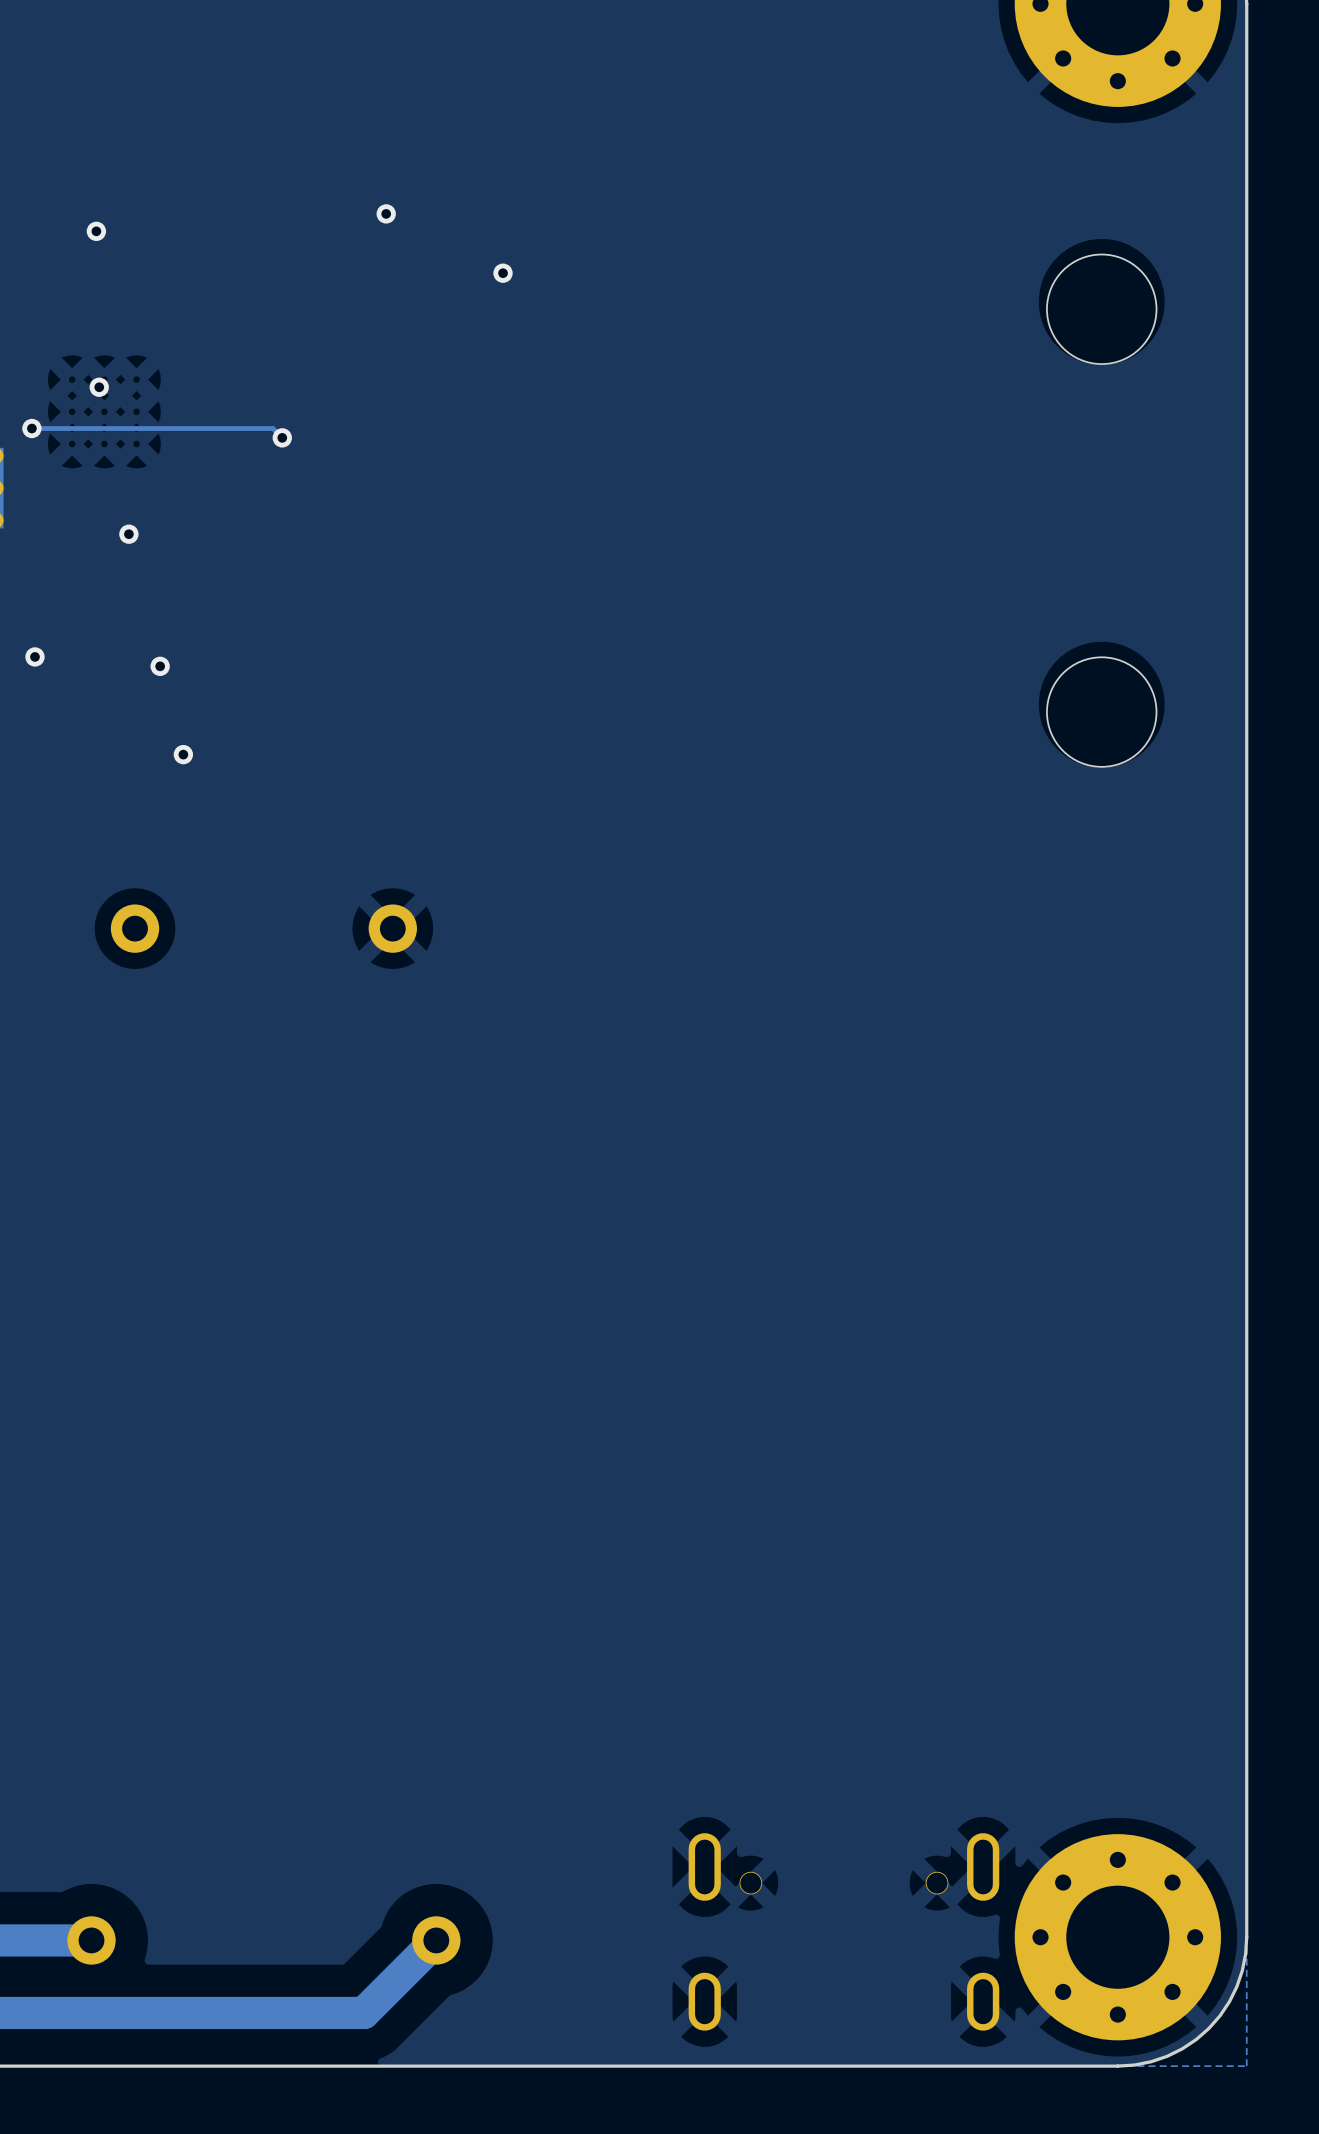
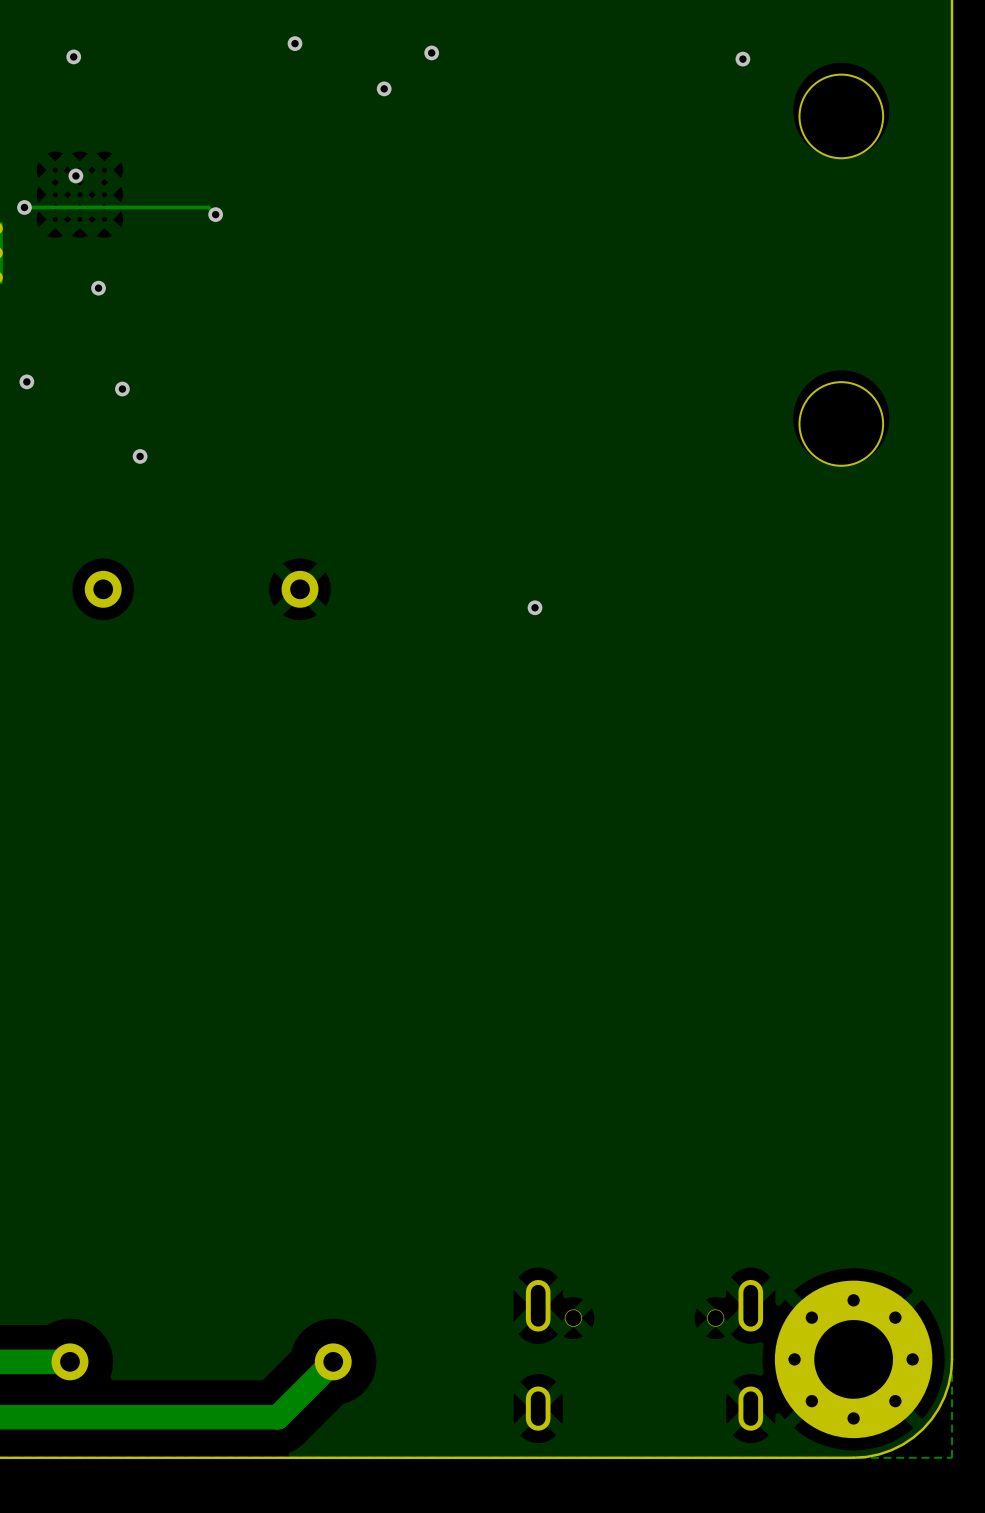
via: none -> (431, 52)
via: none -> (742, 59)
via: none -> (535, 607)

